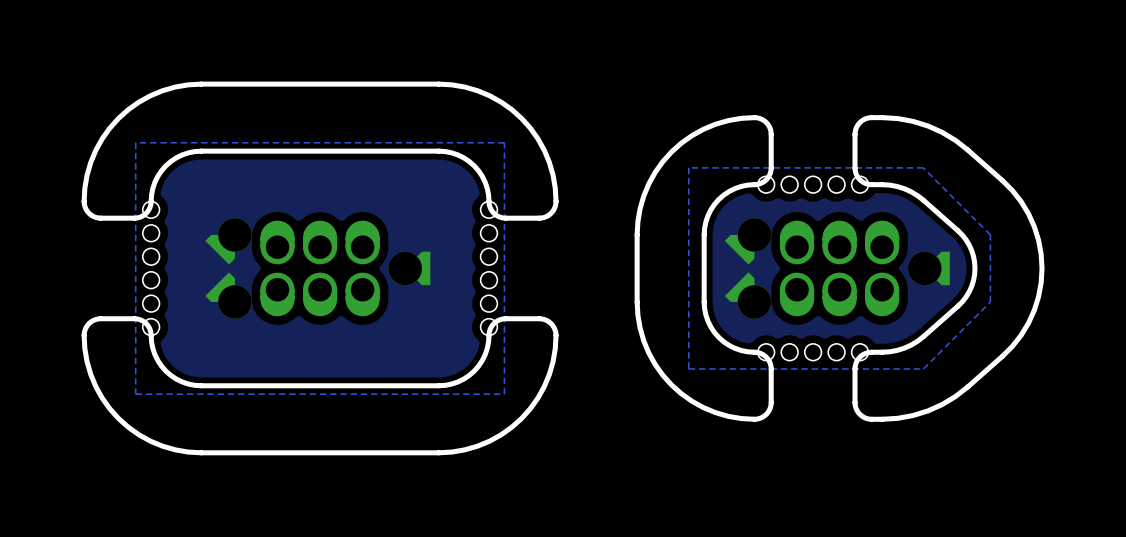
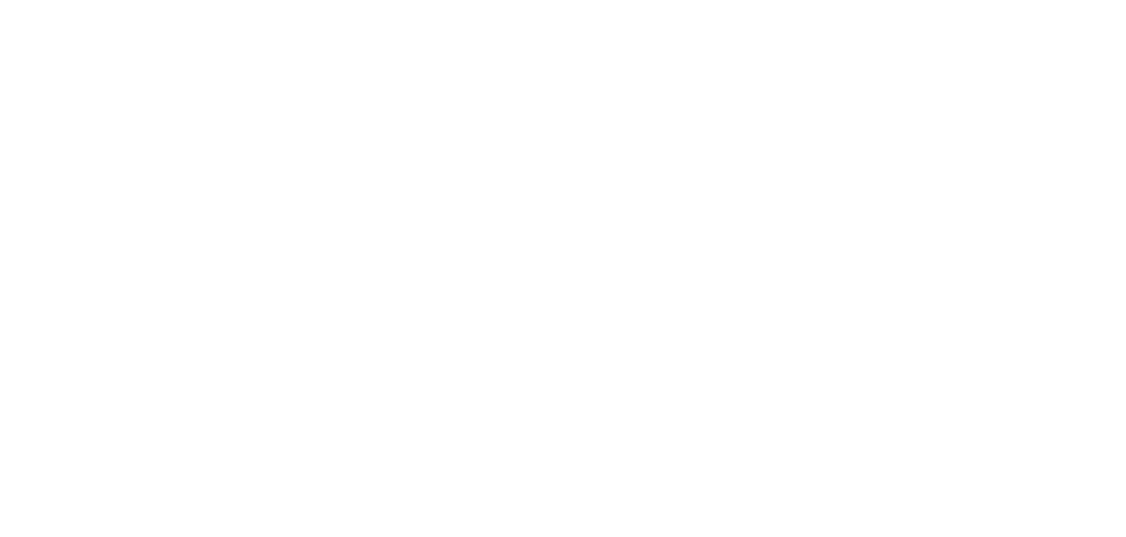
zone outline: (504, 142) (504, 394) (135, 394) (135, 142) (504, 142) -> none
zone outline: (923, 167) (990, 234) (990, 301) (923, 369) (688, 369) (688, 167) (923, 167) -> none
part: (320, 268) -> none
part: (839, 268) -> none

